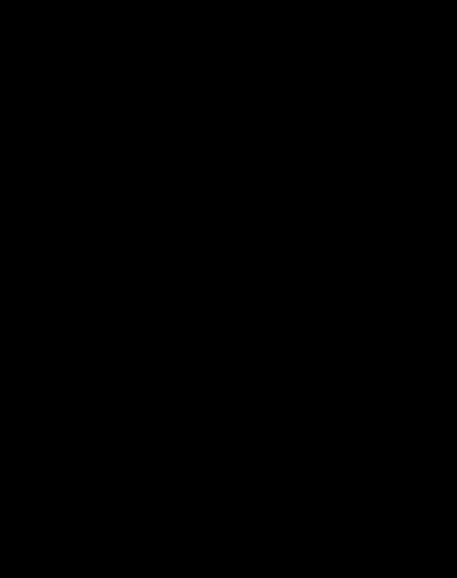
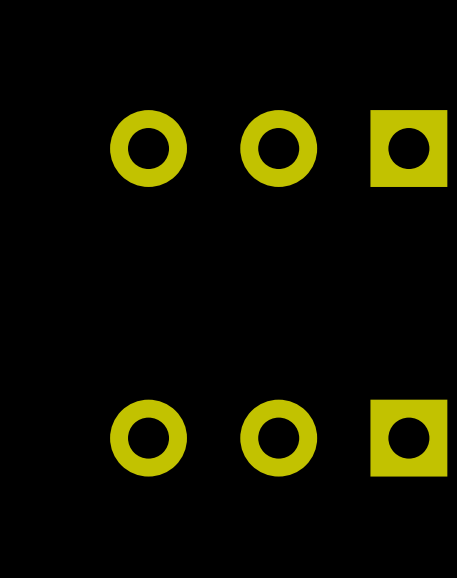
part: none -> (278, 148)
part: none -> (278, 438)

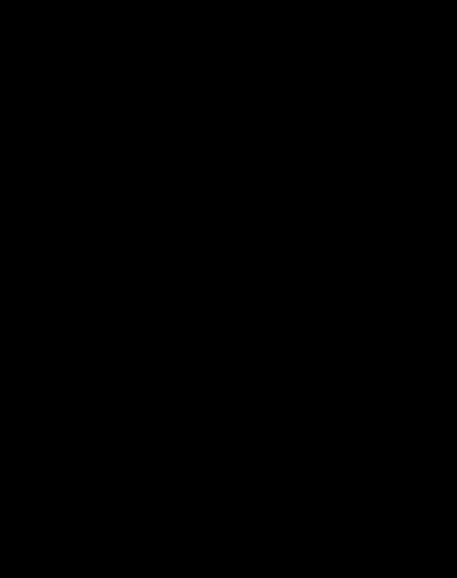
part: (278, 148) -> none
part: (278, 438) -> none

